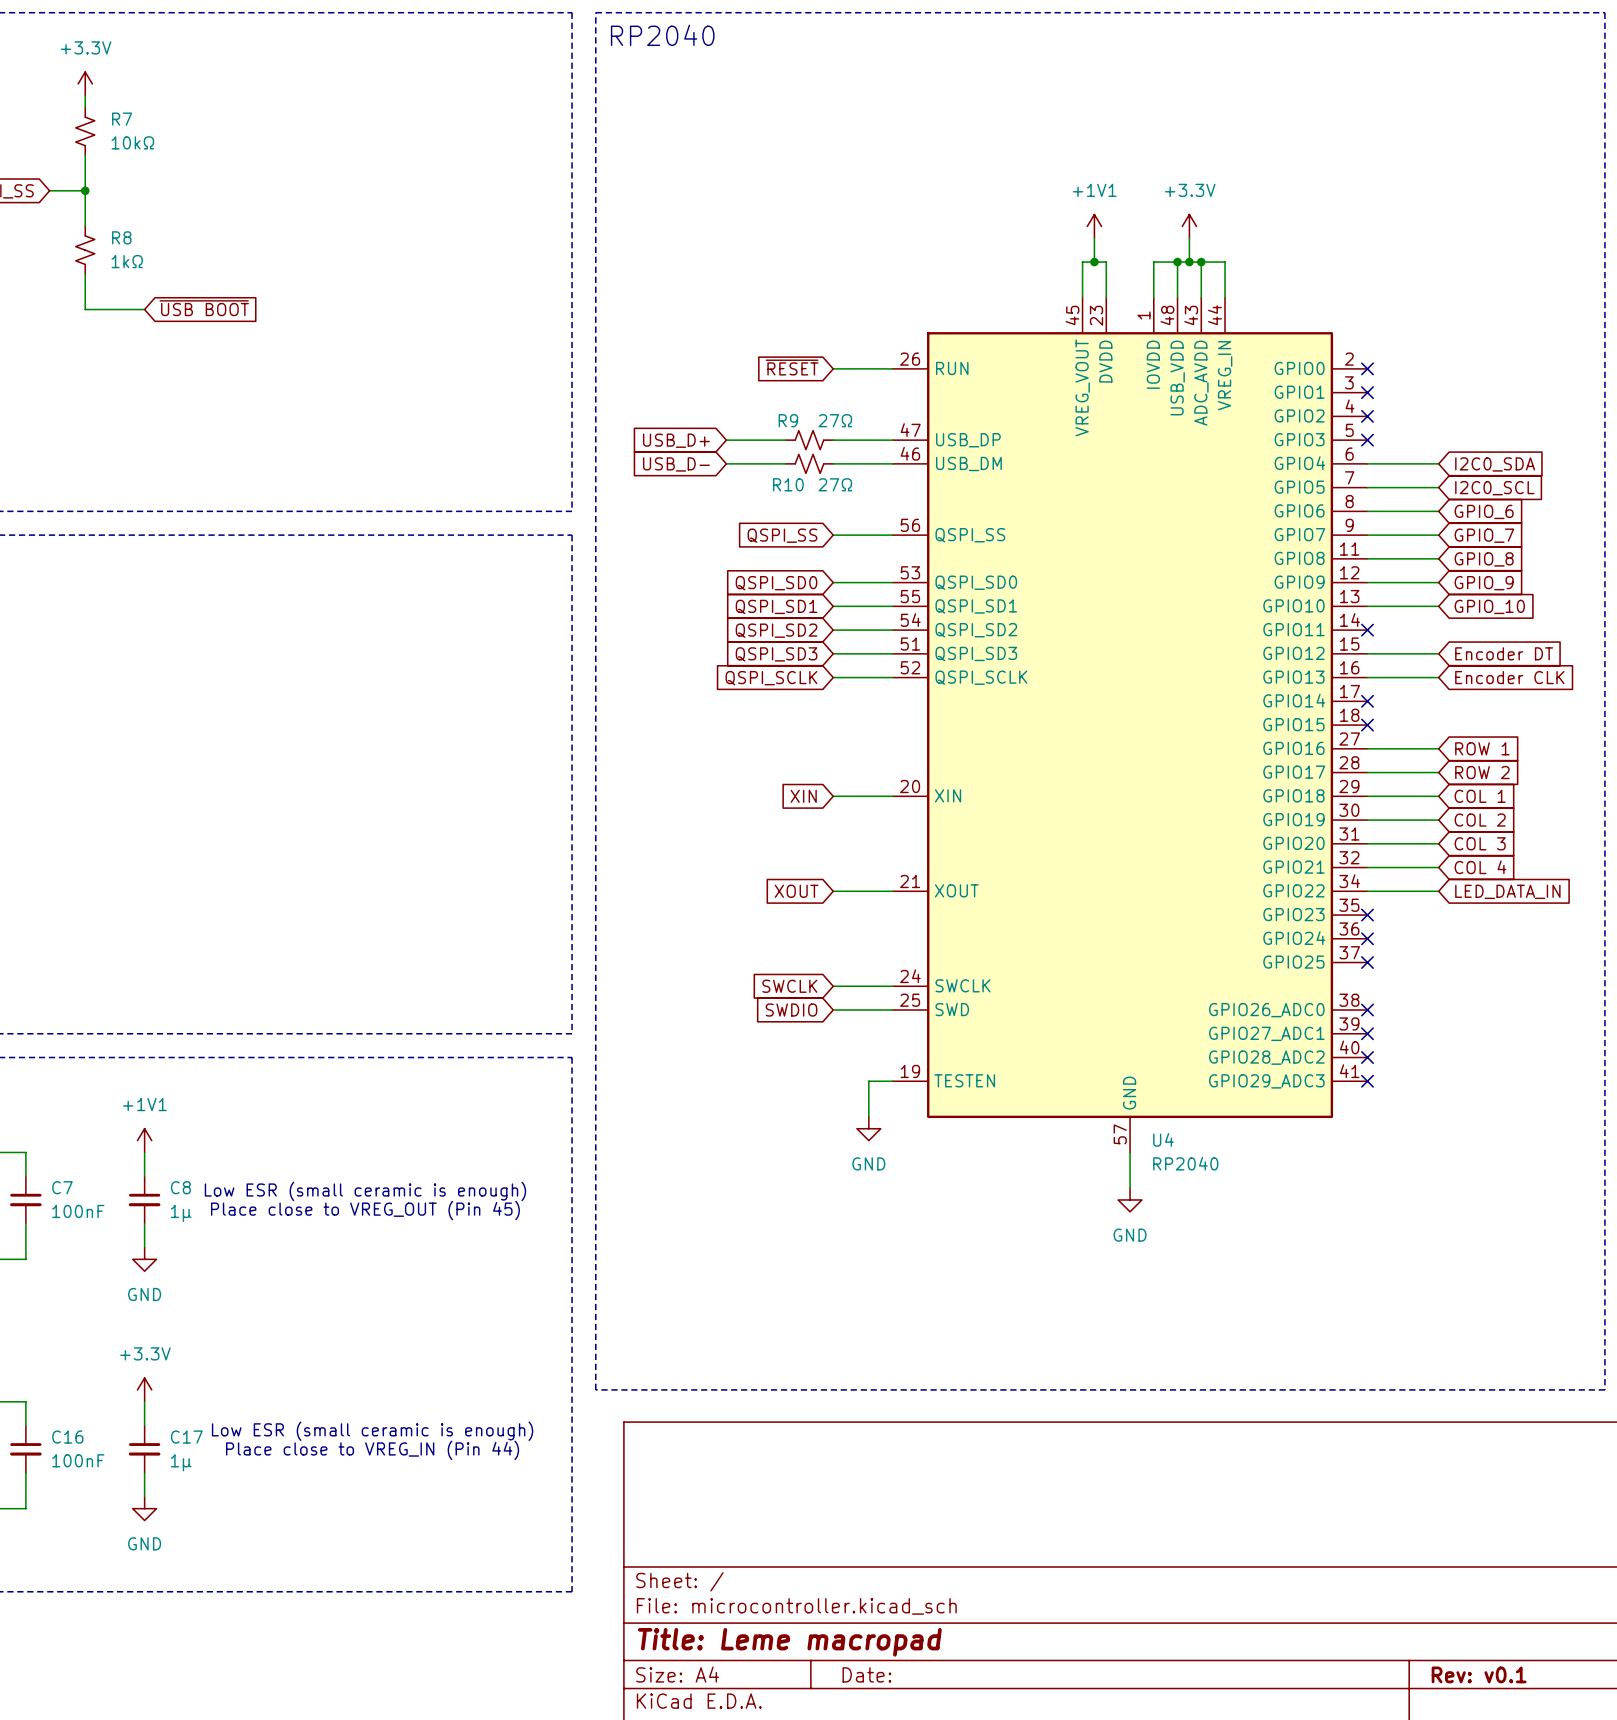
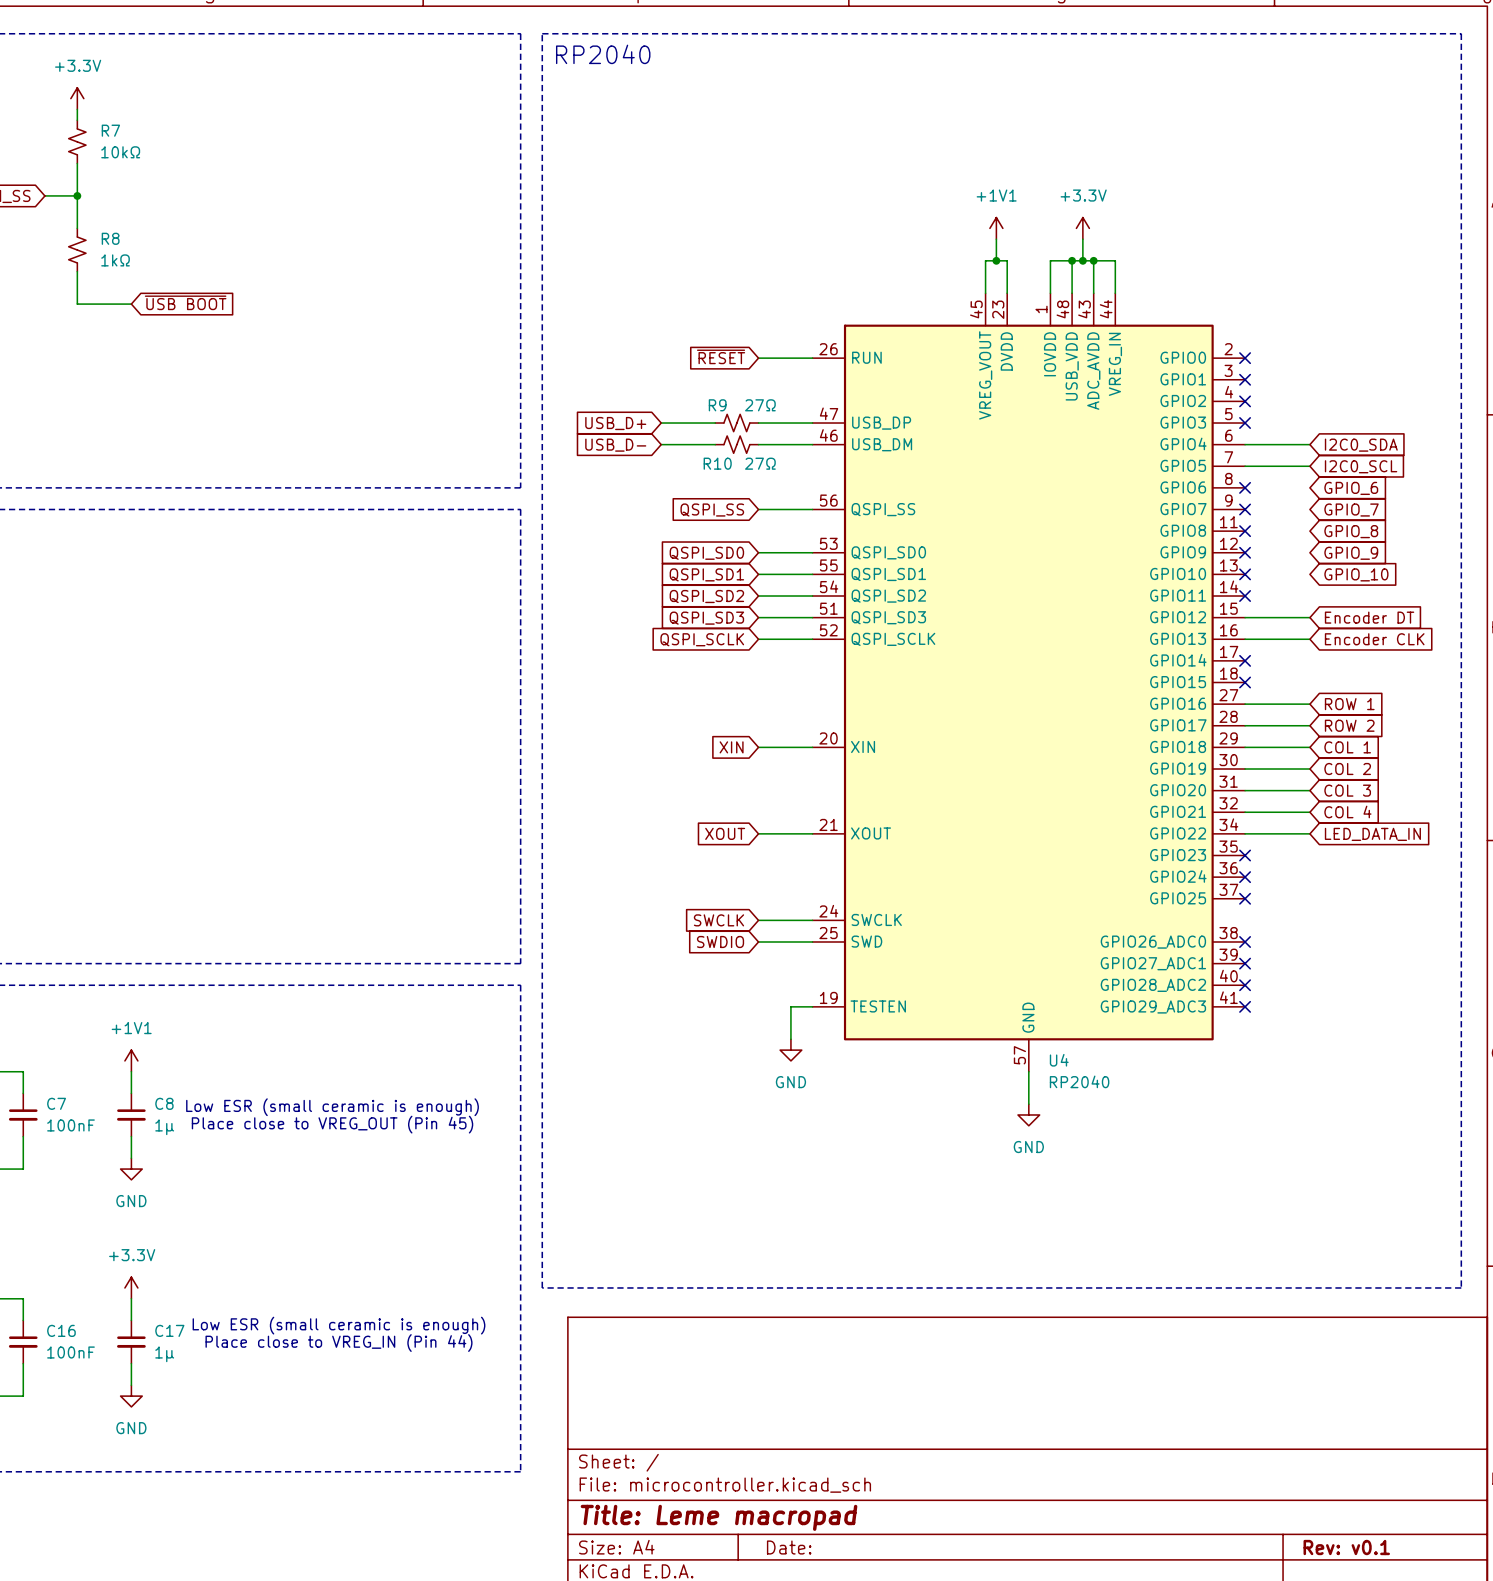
wire: (1367, 511) (1438, 511) -> none
no-connect mark: none -> (1245, 487)
wire: (1367, 535) (1438, 535) -> none
no-connect mark: none -> (1245, 509)
wire: (1367, 558) (1438, 558) -> none
no-connect mark: none -> (1245, 531)
wire: (1367, 582) (1438, 582) -> none
no-connect mark: none -> (1245, 552)
wire: (1367, 606) (1438, 606) -> none
no-connect mark: none -> (1245, 574)

